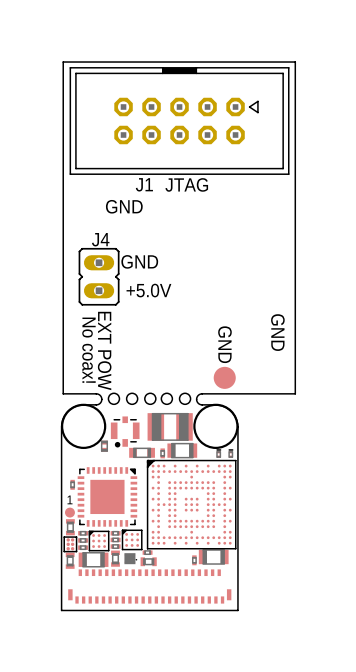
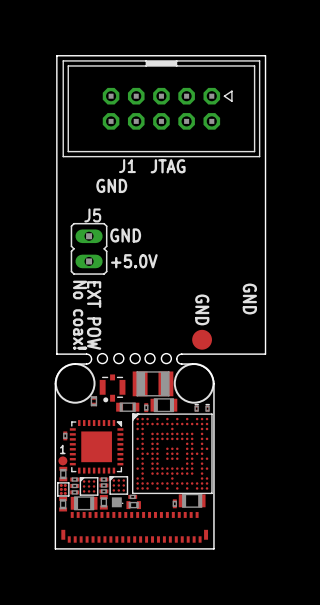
J4 name: J4 (100, 239) -> J5 (92, 215)

